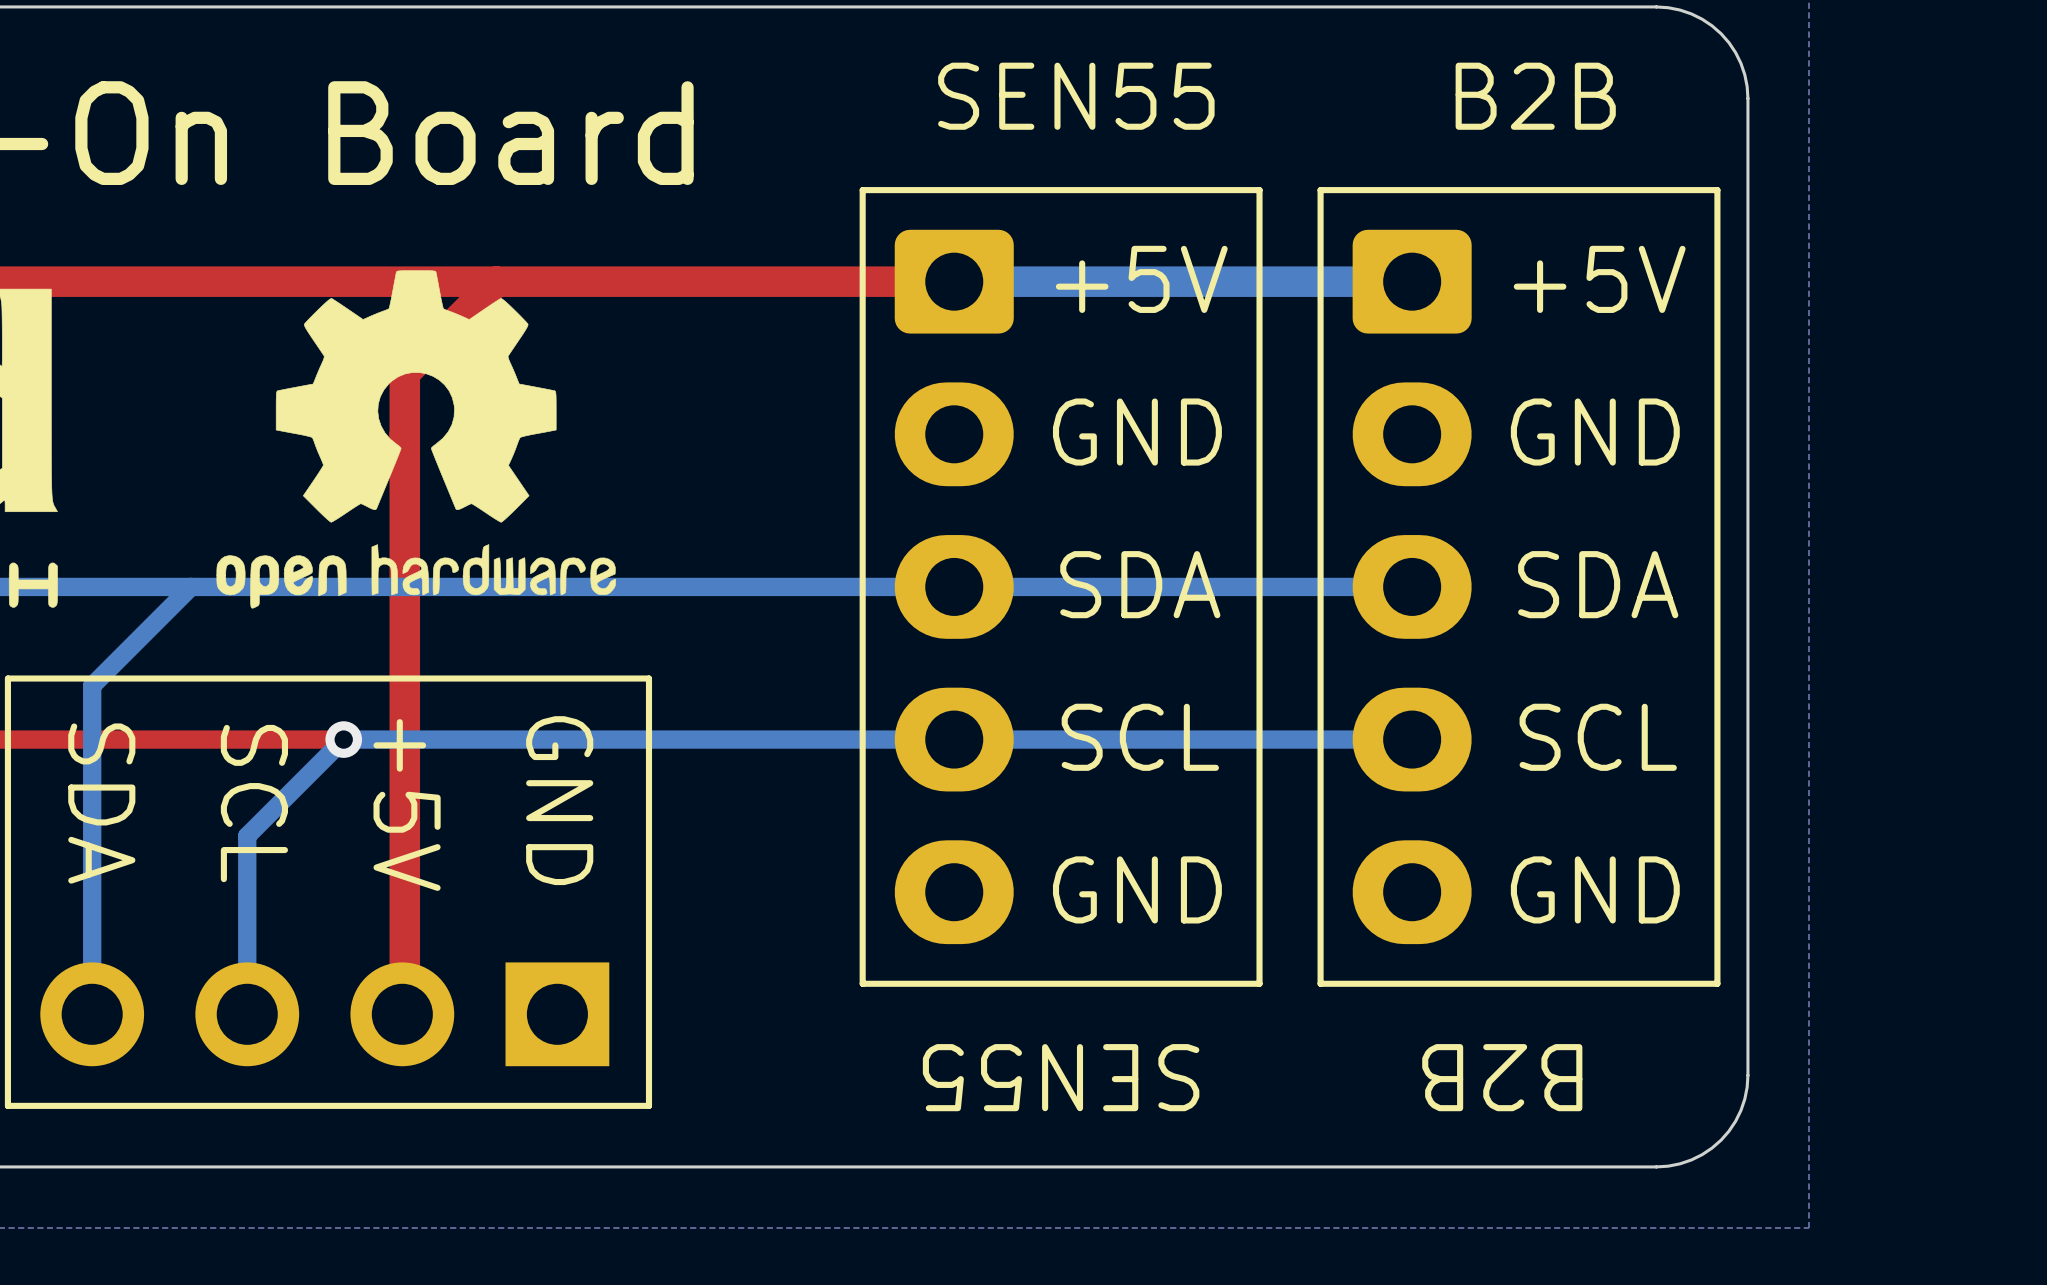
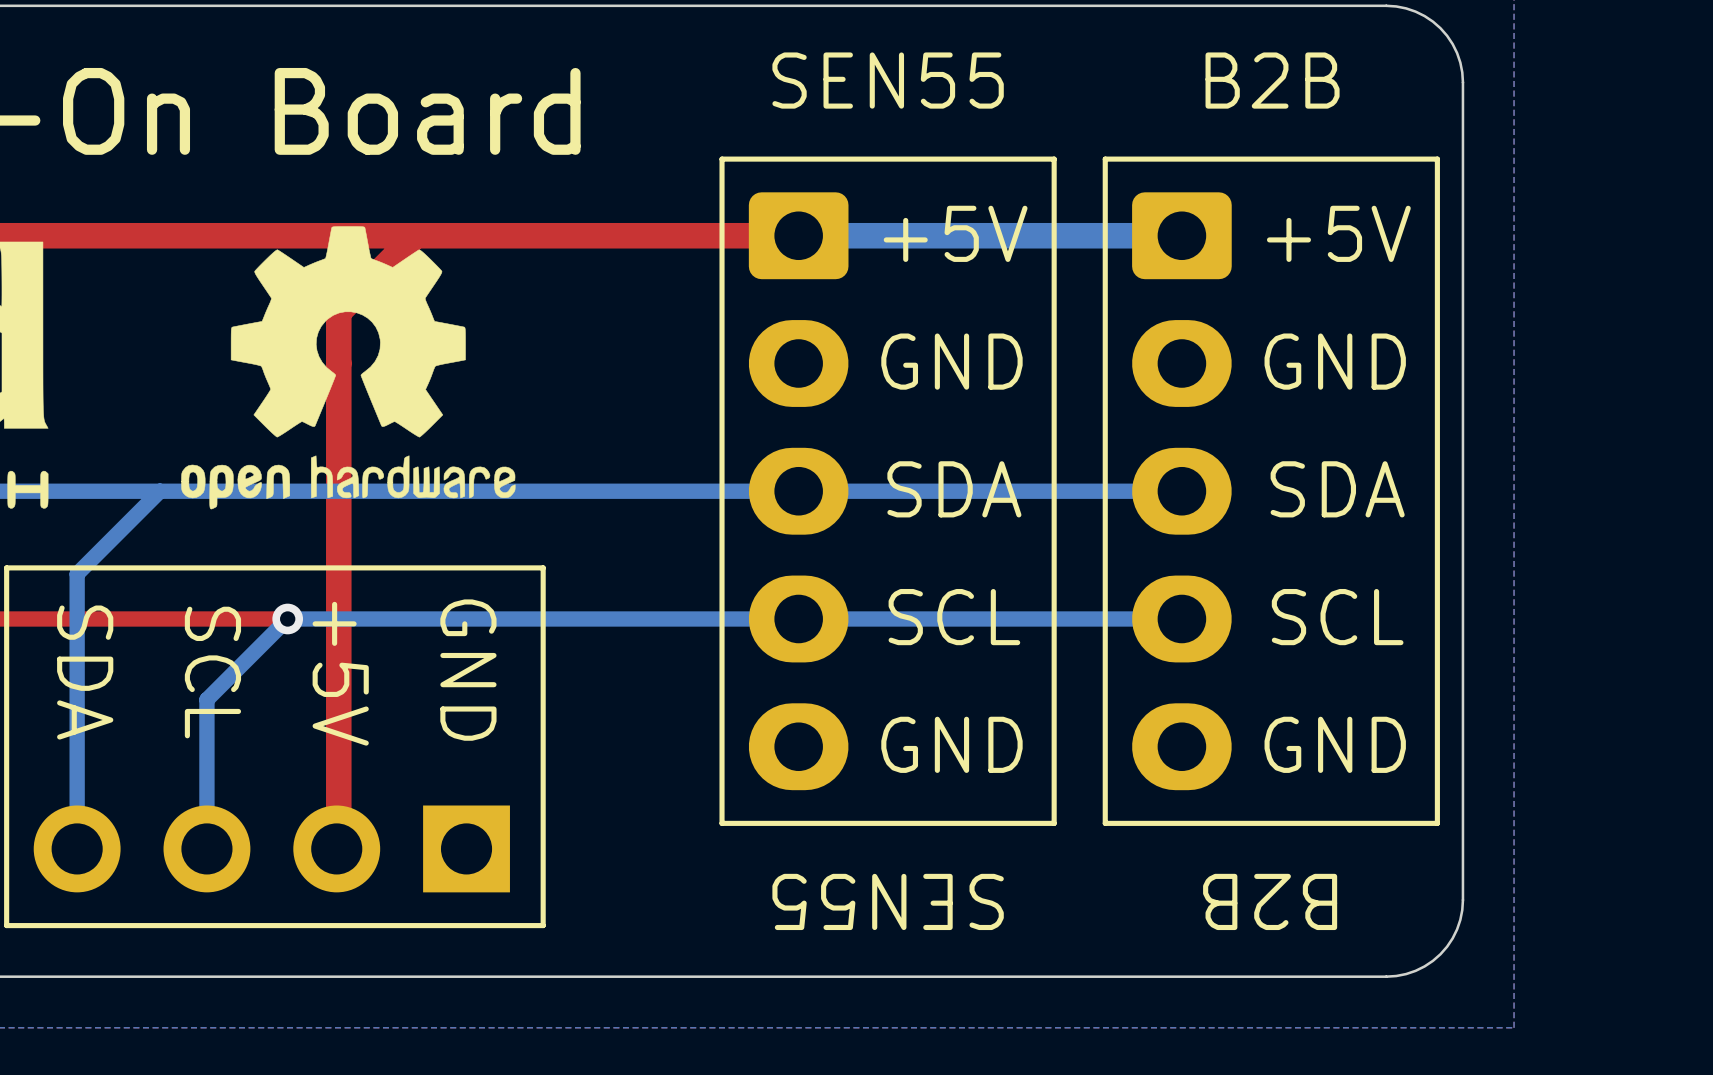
text position: SEN55 (1076, 96) -> SEN55 (888, 80)
text position: B2B (1535, 96) -> B2B (1272, 80)
text position: B2B (1502, 1077) -> B2B (1270, 901)

